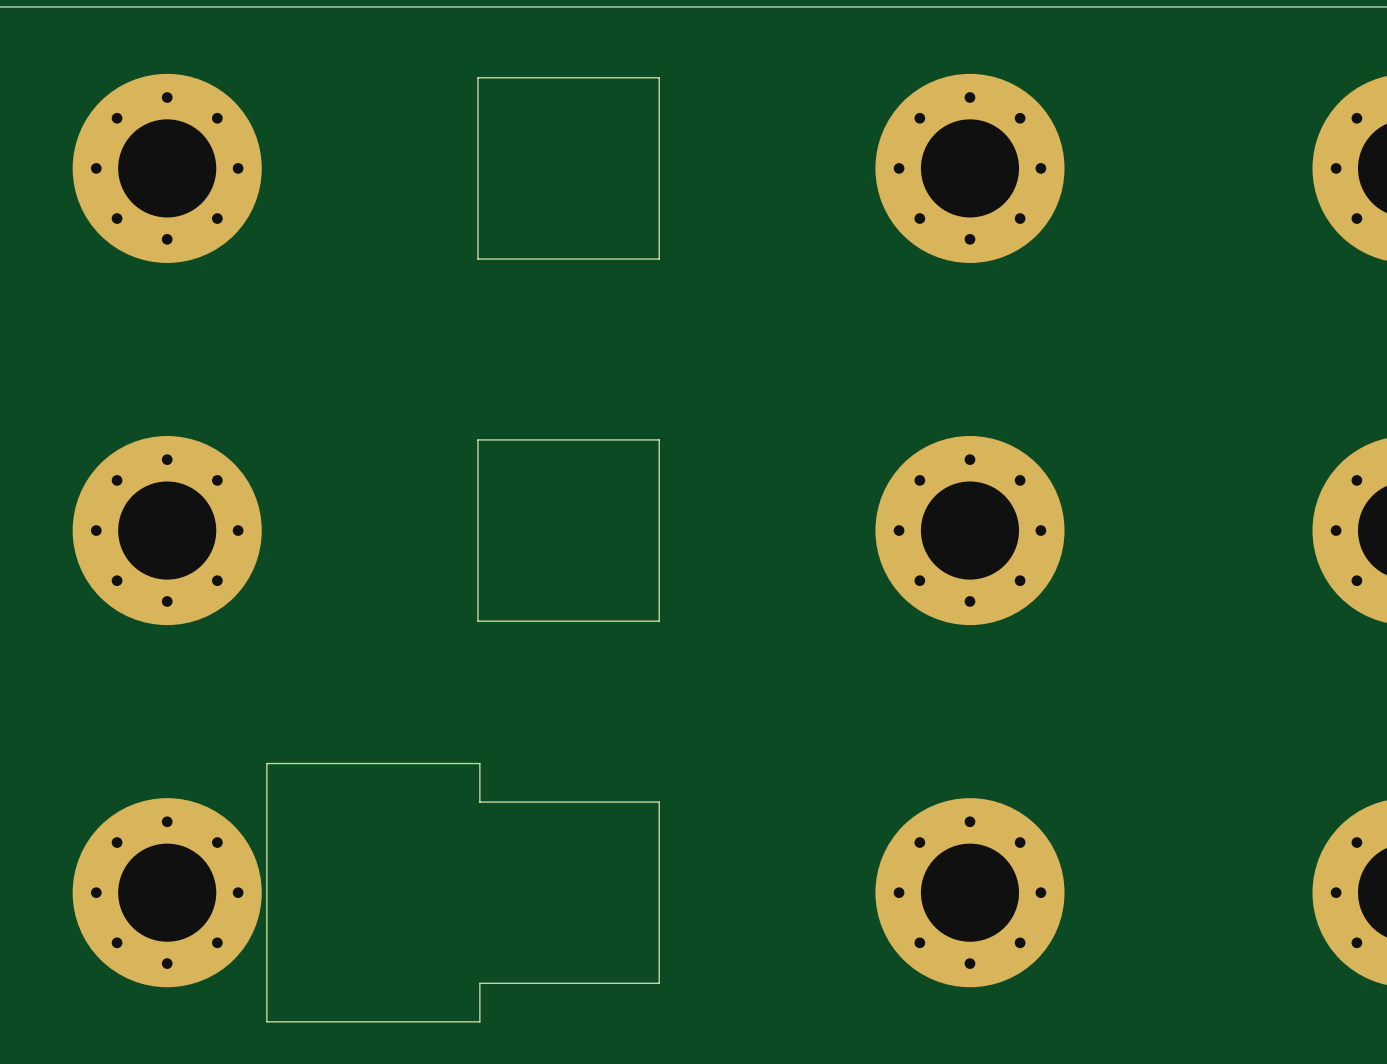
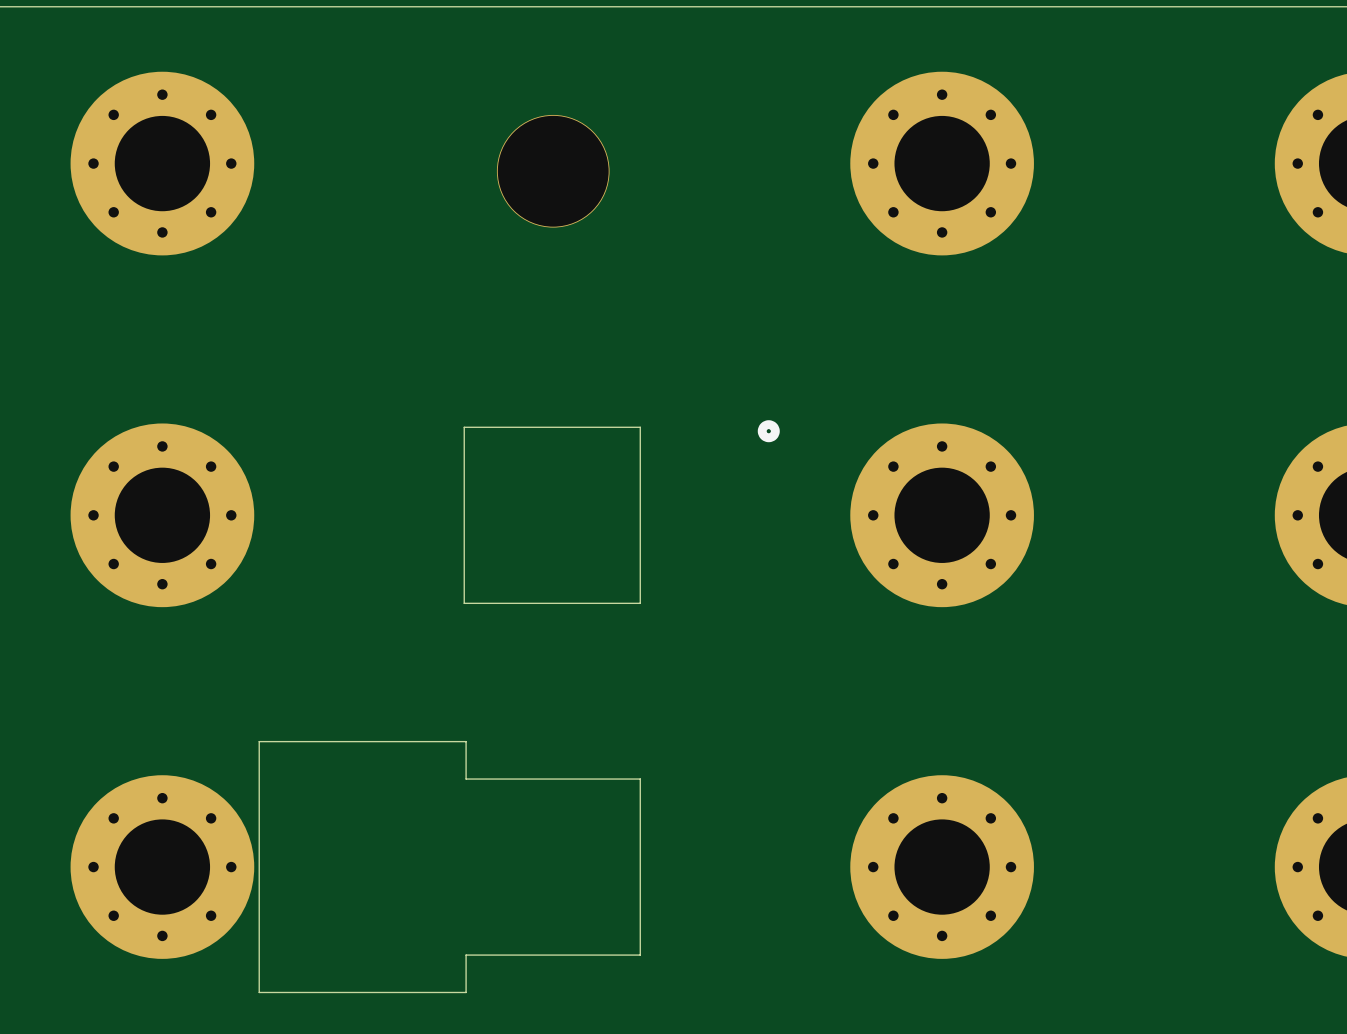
board edge: (659, 77) (477, 77) (477, 259) (659, 259) (659, 77) -> none
part: none -> (553, 171)
part: none -> (768, 431)

